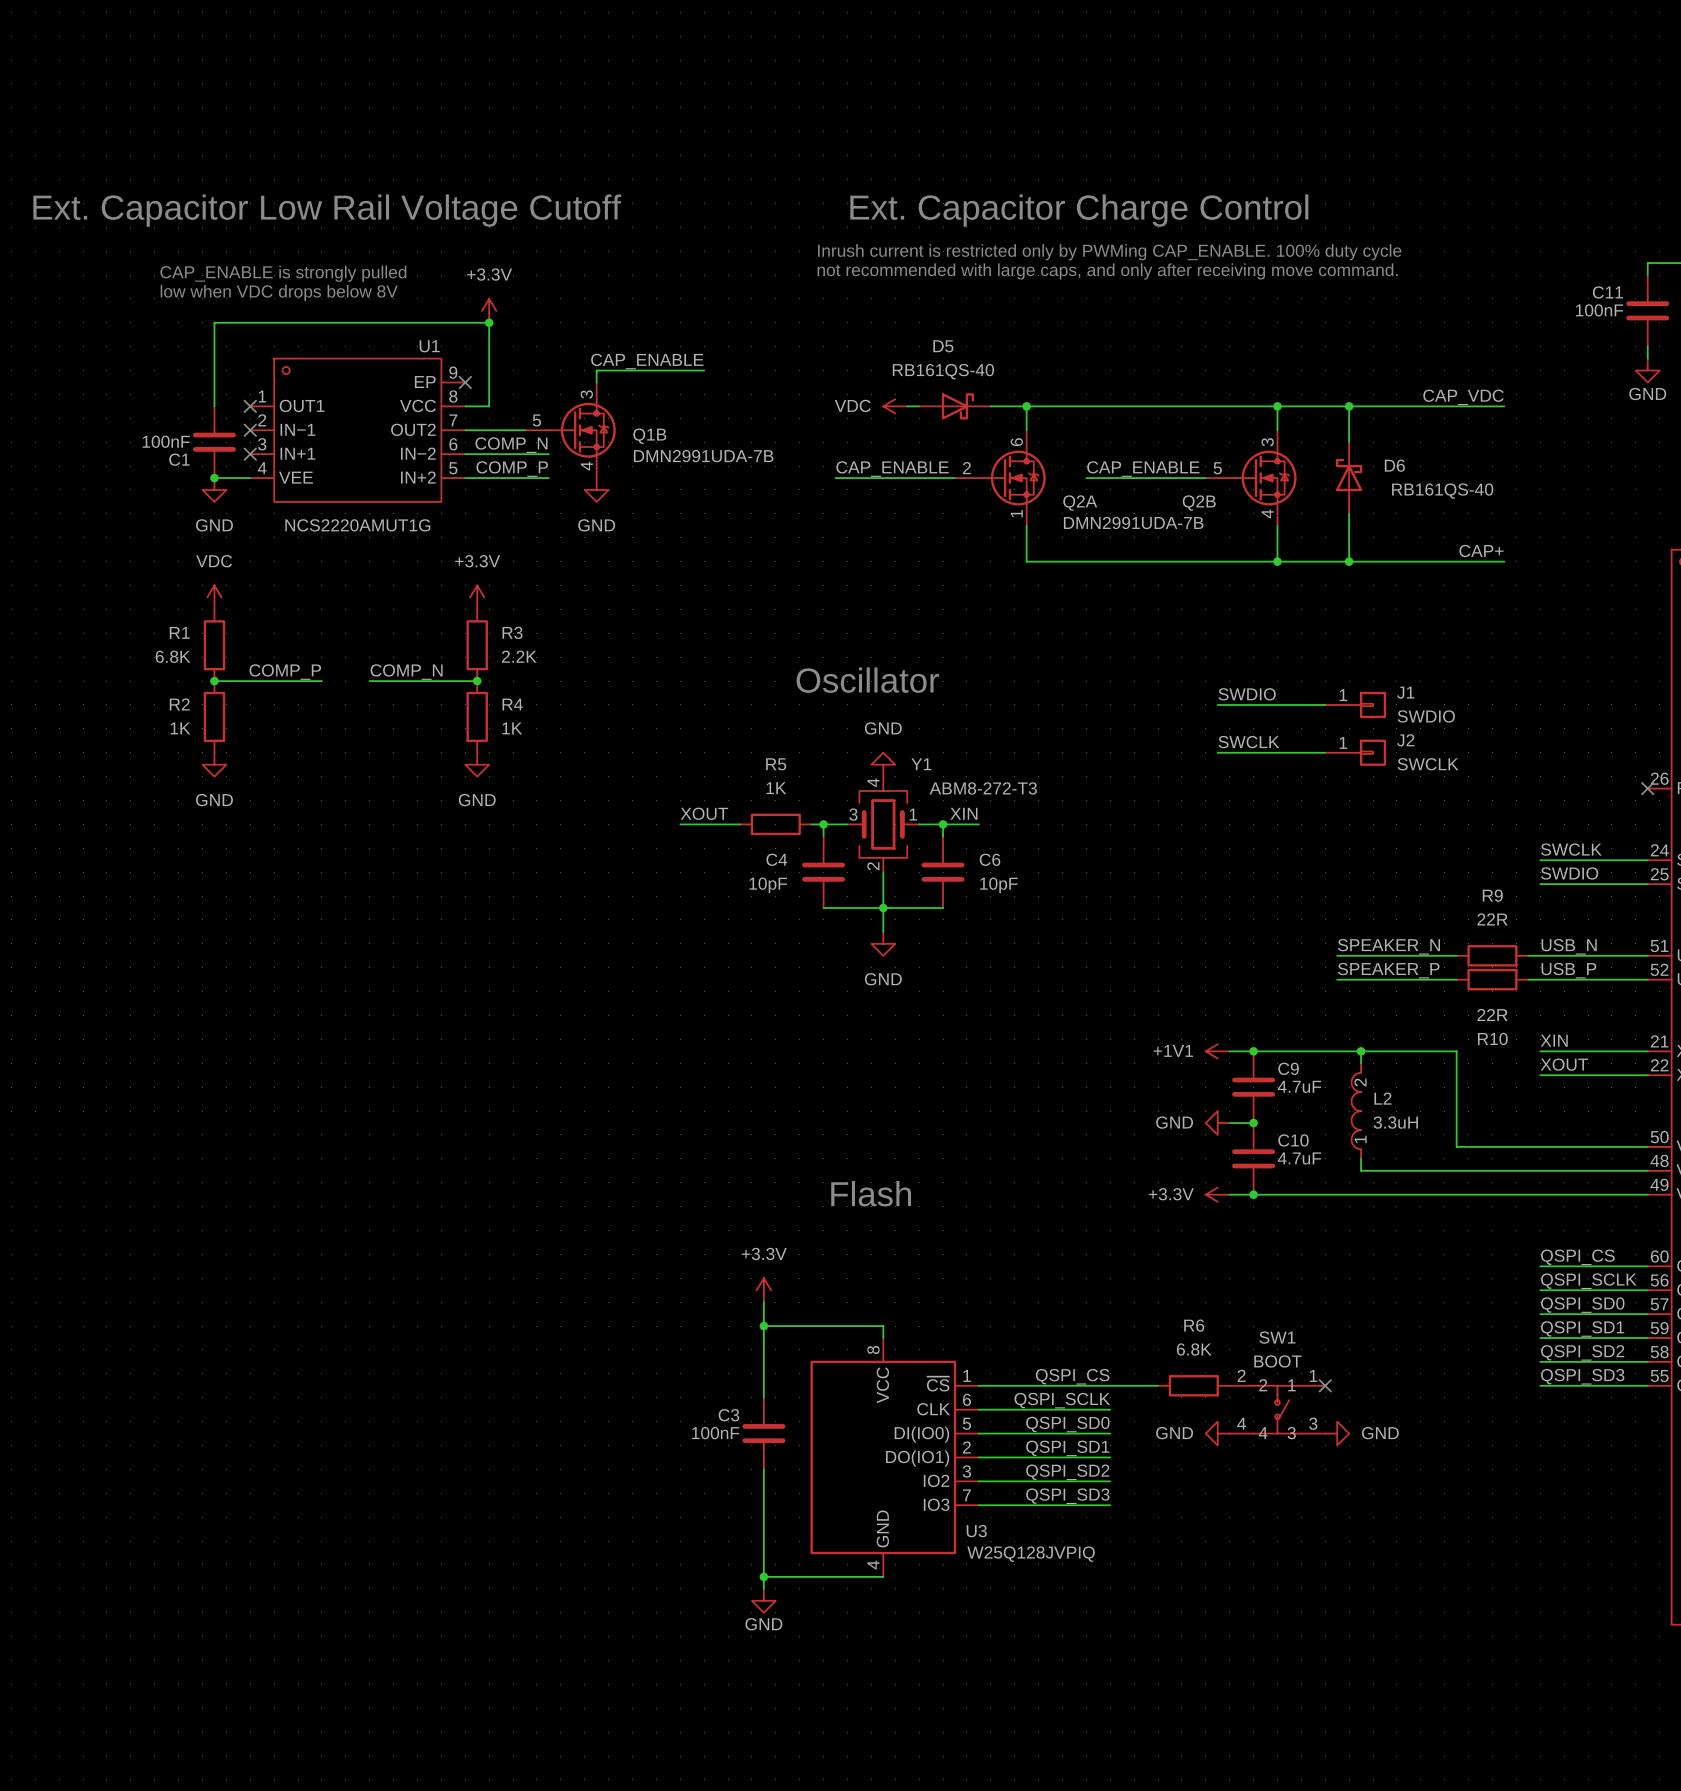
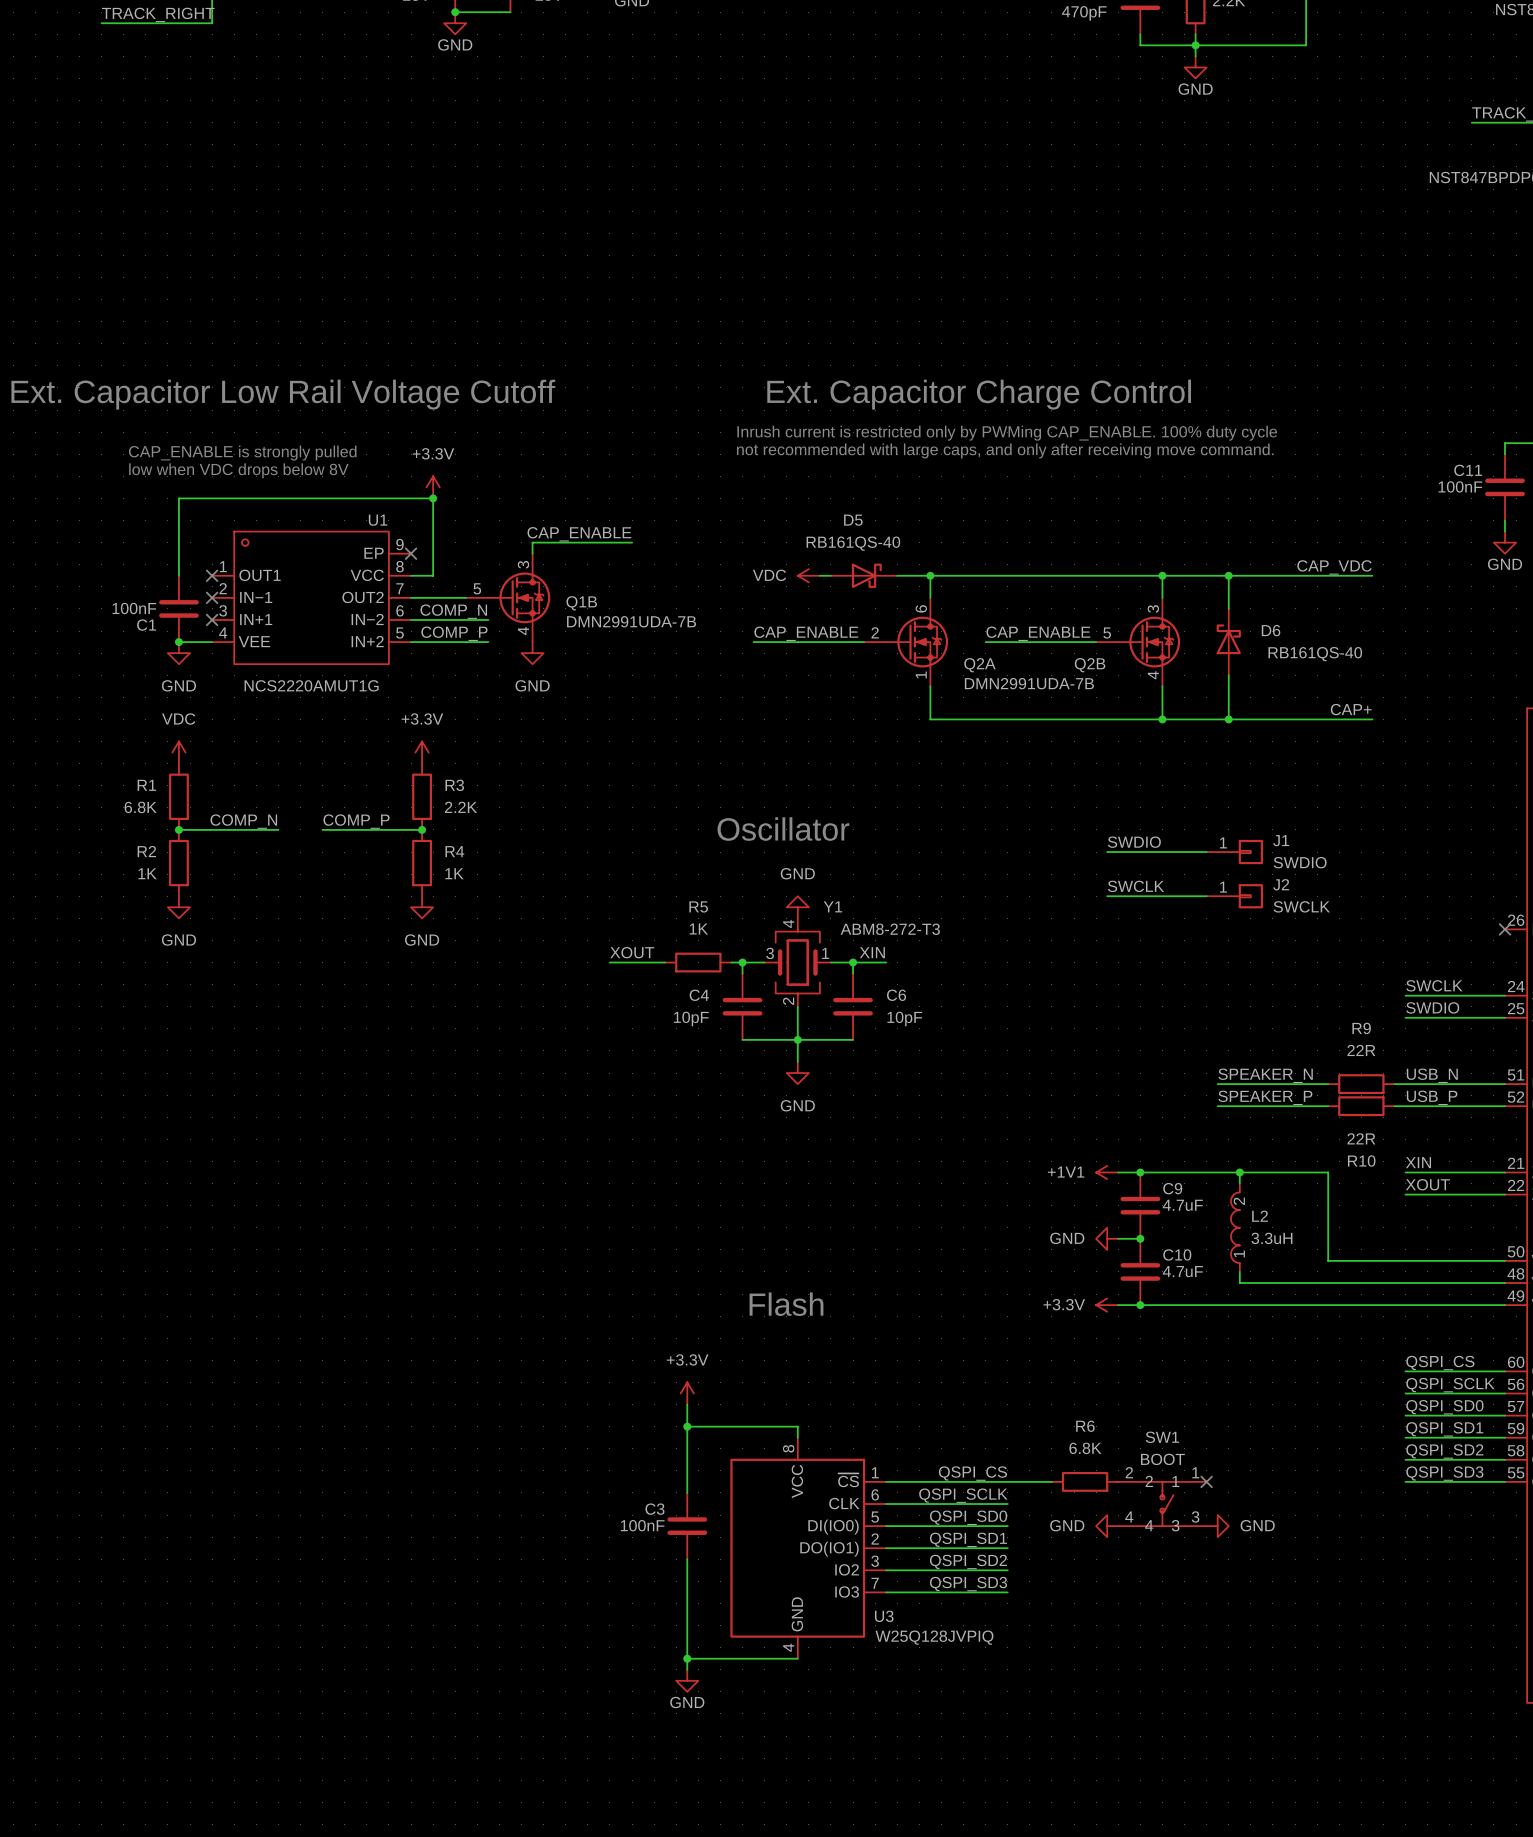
label: COMP_P (285, 672) -> COMP_N (243, 821)
label: COMP_N (406, 672) -> COMP_P (356, 821)

